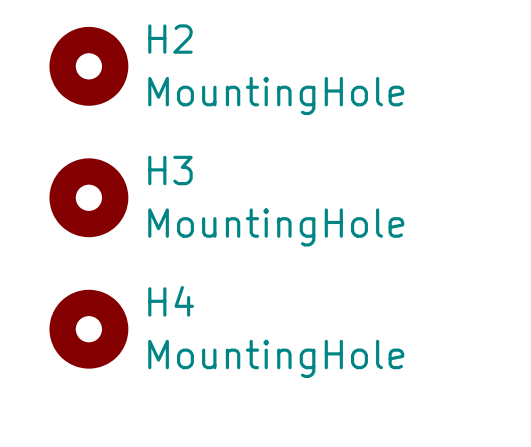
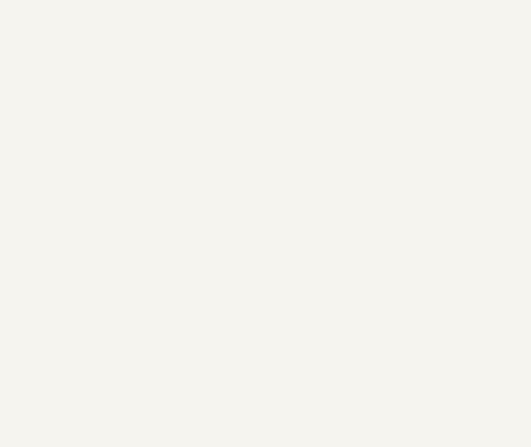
H2: MountingHole (88, 66) -> none
H3: MountingHole (88, 197) -> none
H4: MountingHole (88, 329) -> none

